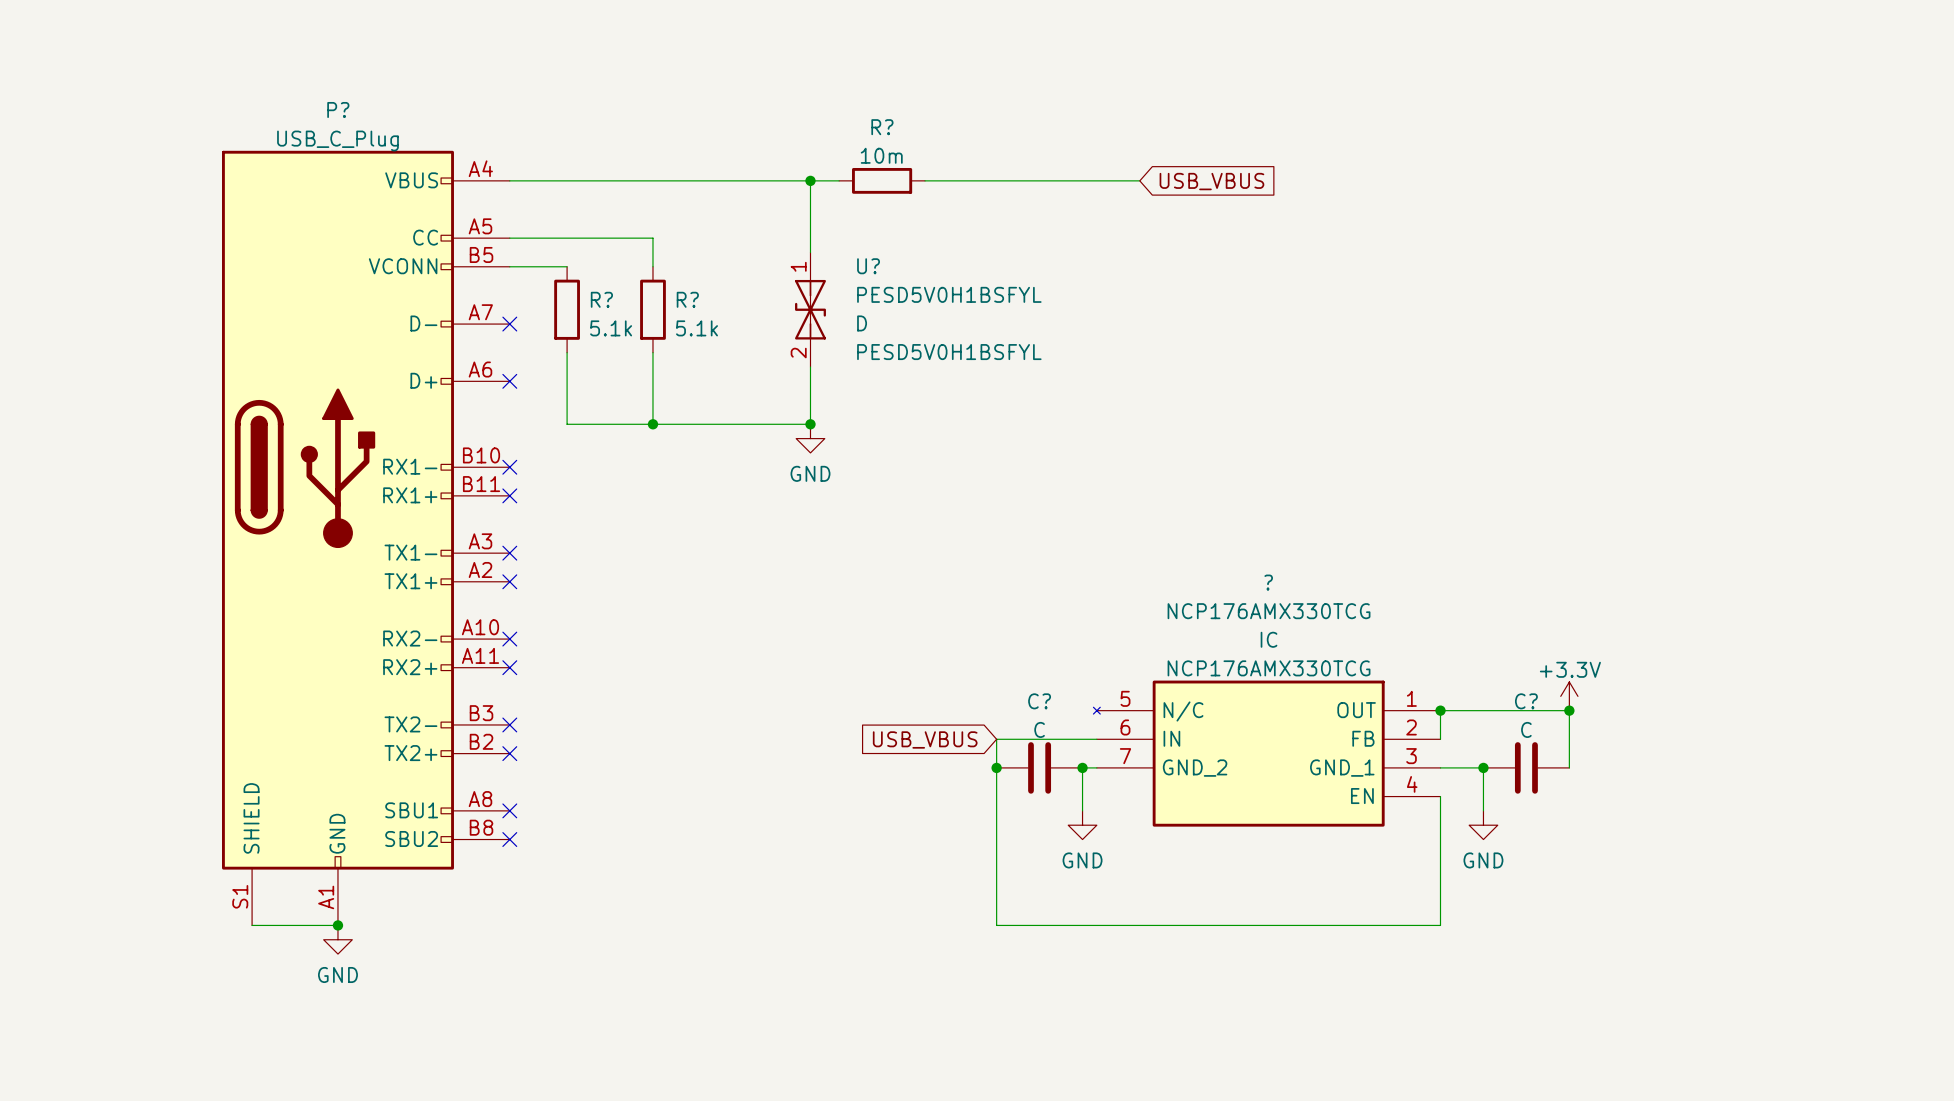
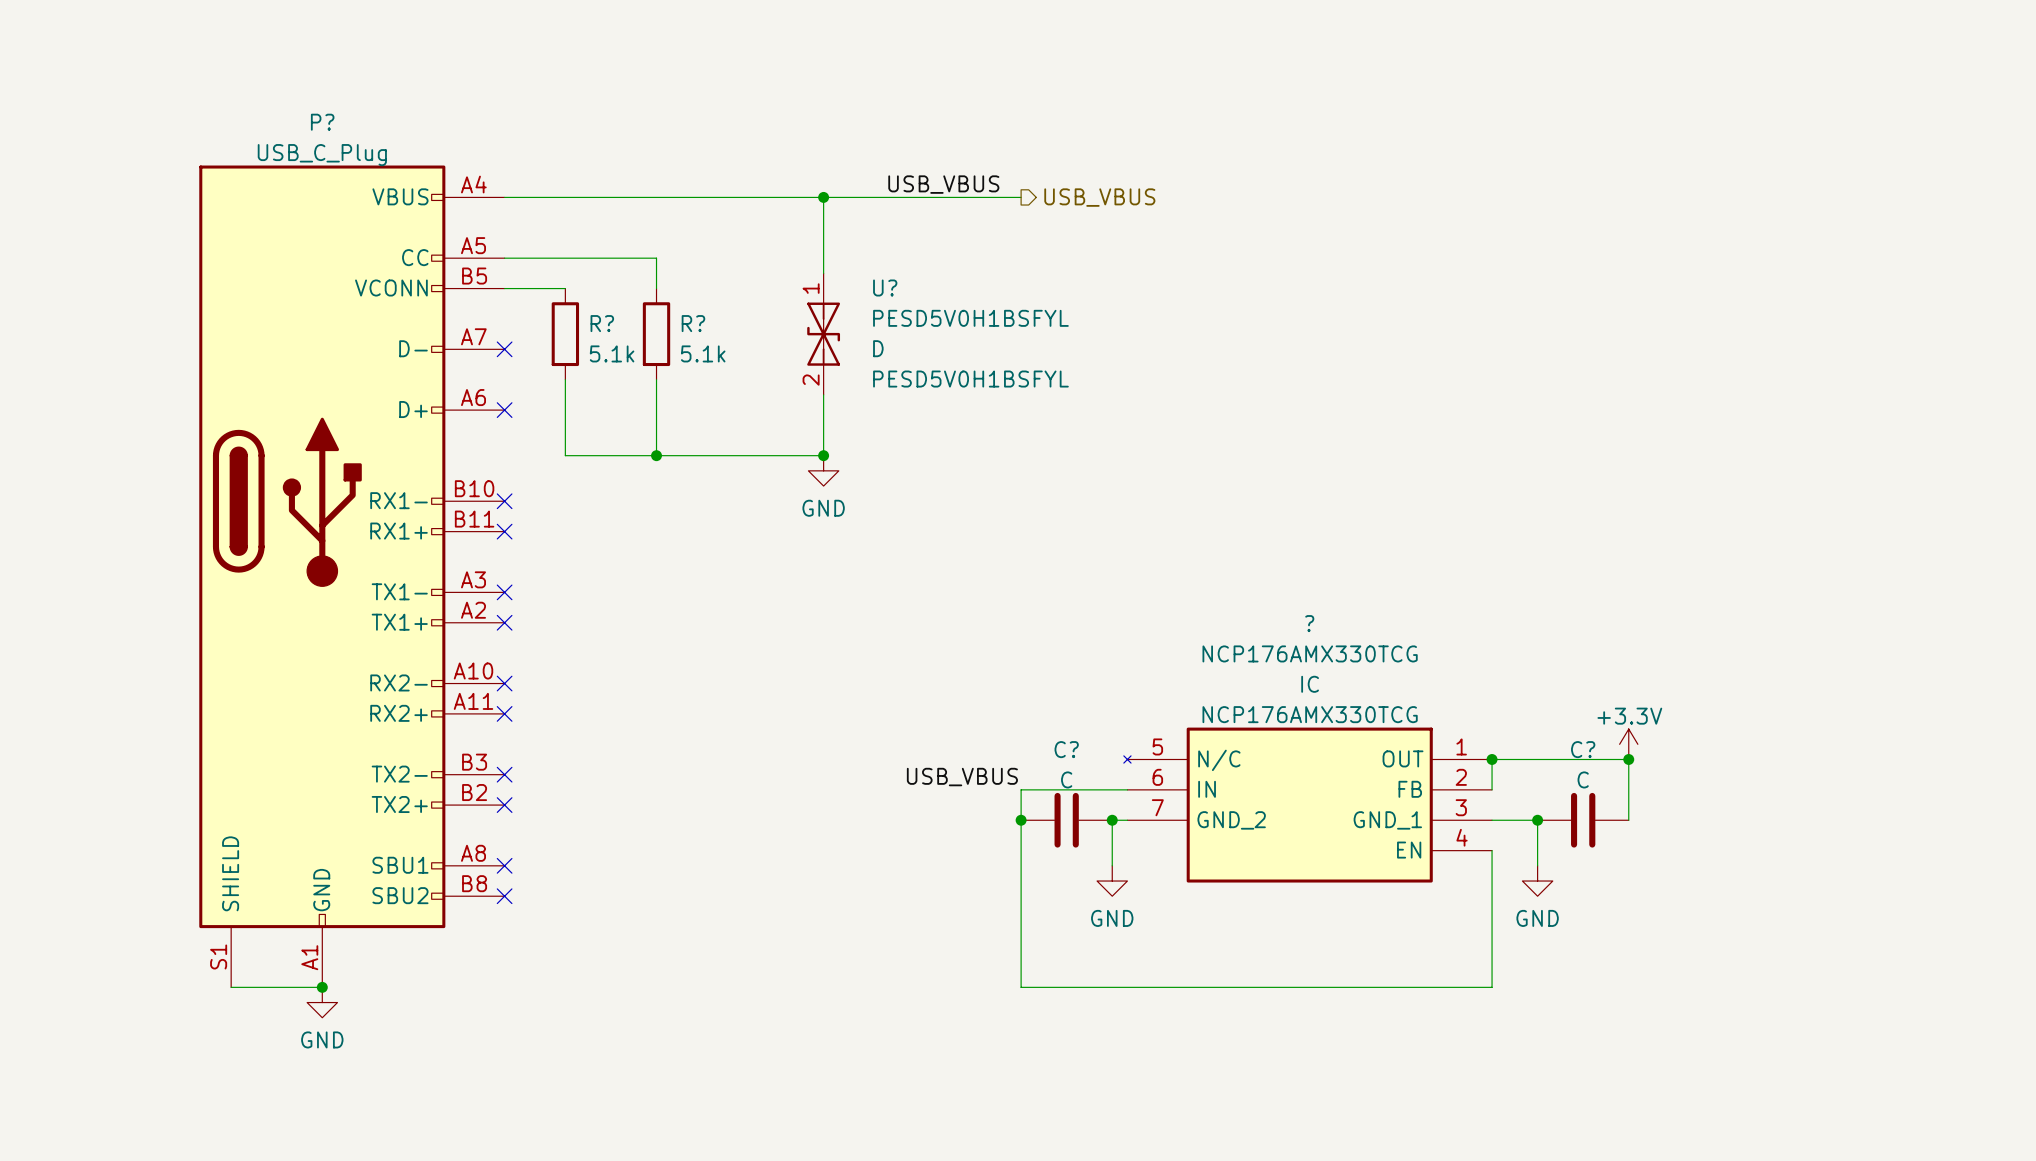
label: none -> USB_VBUS (943, 184)
wire: none -> (854, 197) (945, 197)
R?: 10m (882, 180) -> none
wire: (996, 180) (1139, 180) -> none
hierarchical label: none -> USB_VBUS (1099, 197)
global label: USB_VBUS (1211, 181) -> none
label: none -> USB_VBUS (962, 777)
global label: USB_VBUS (925, 739) -> none

